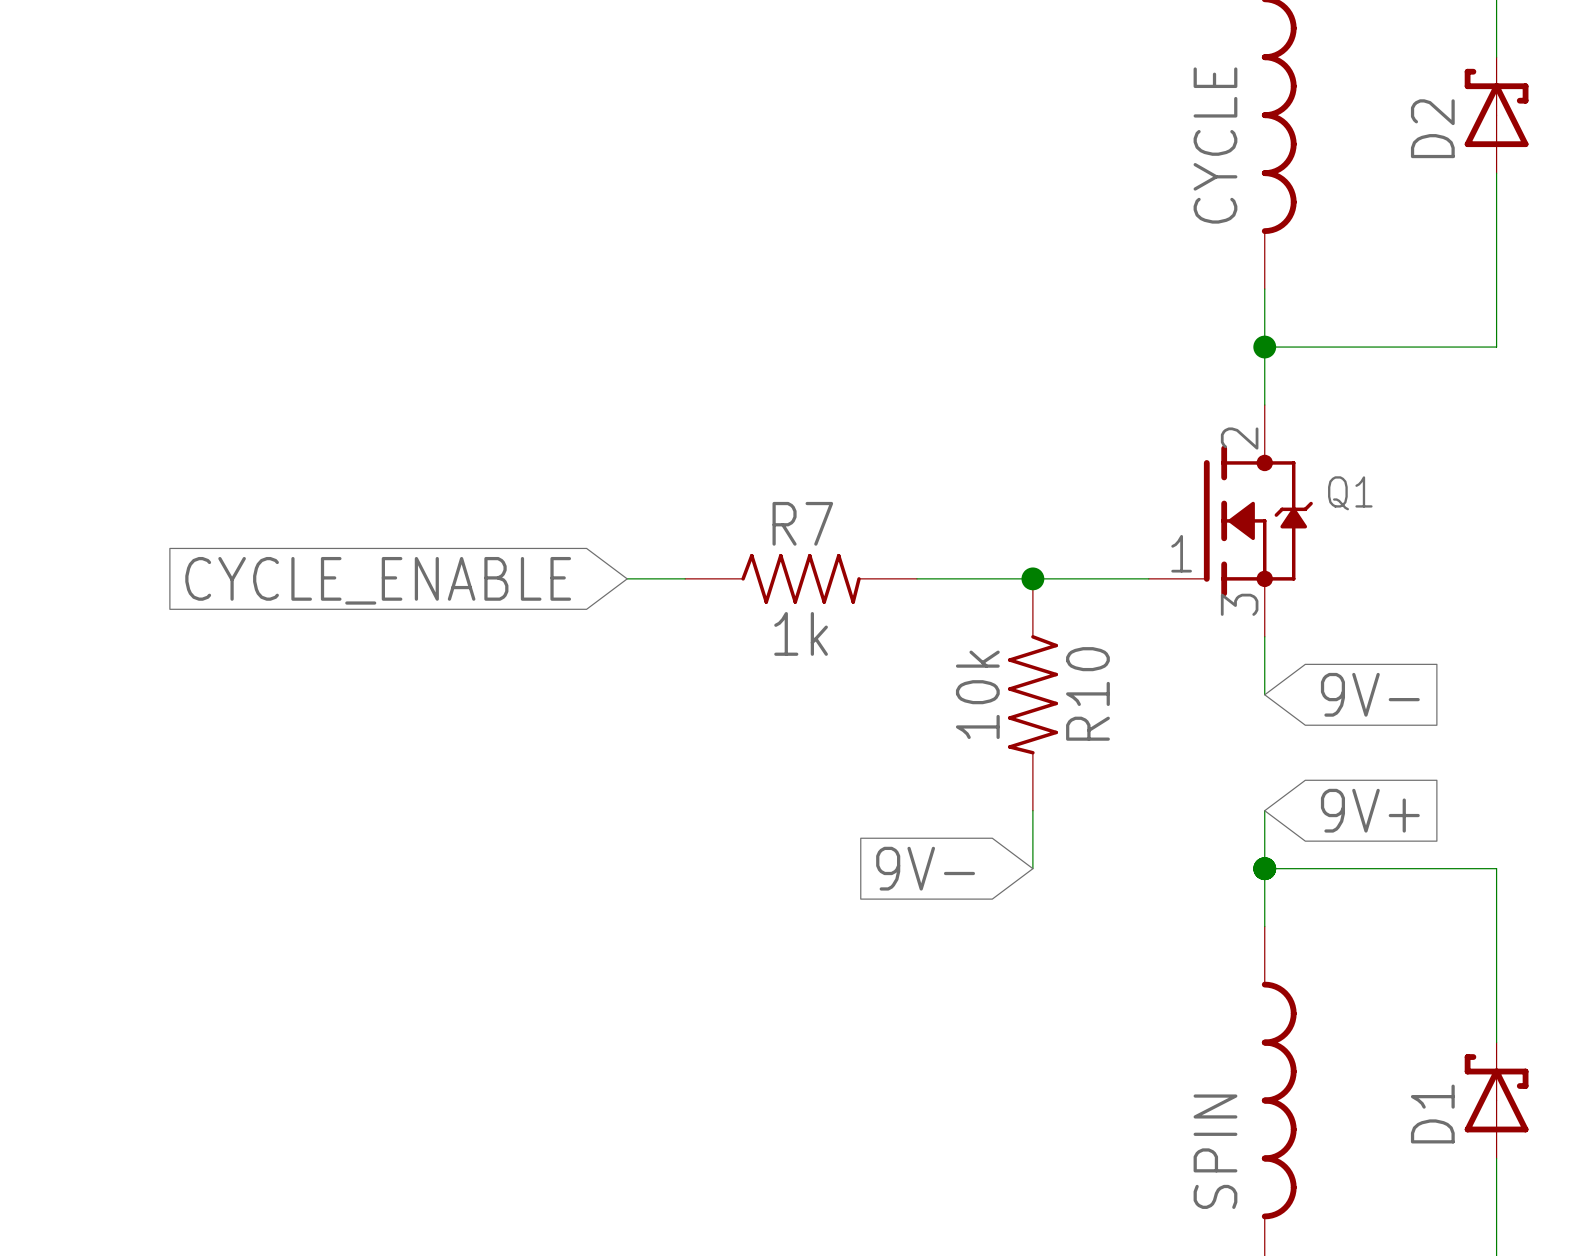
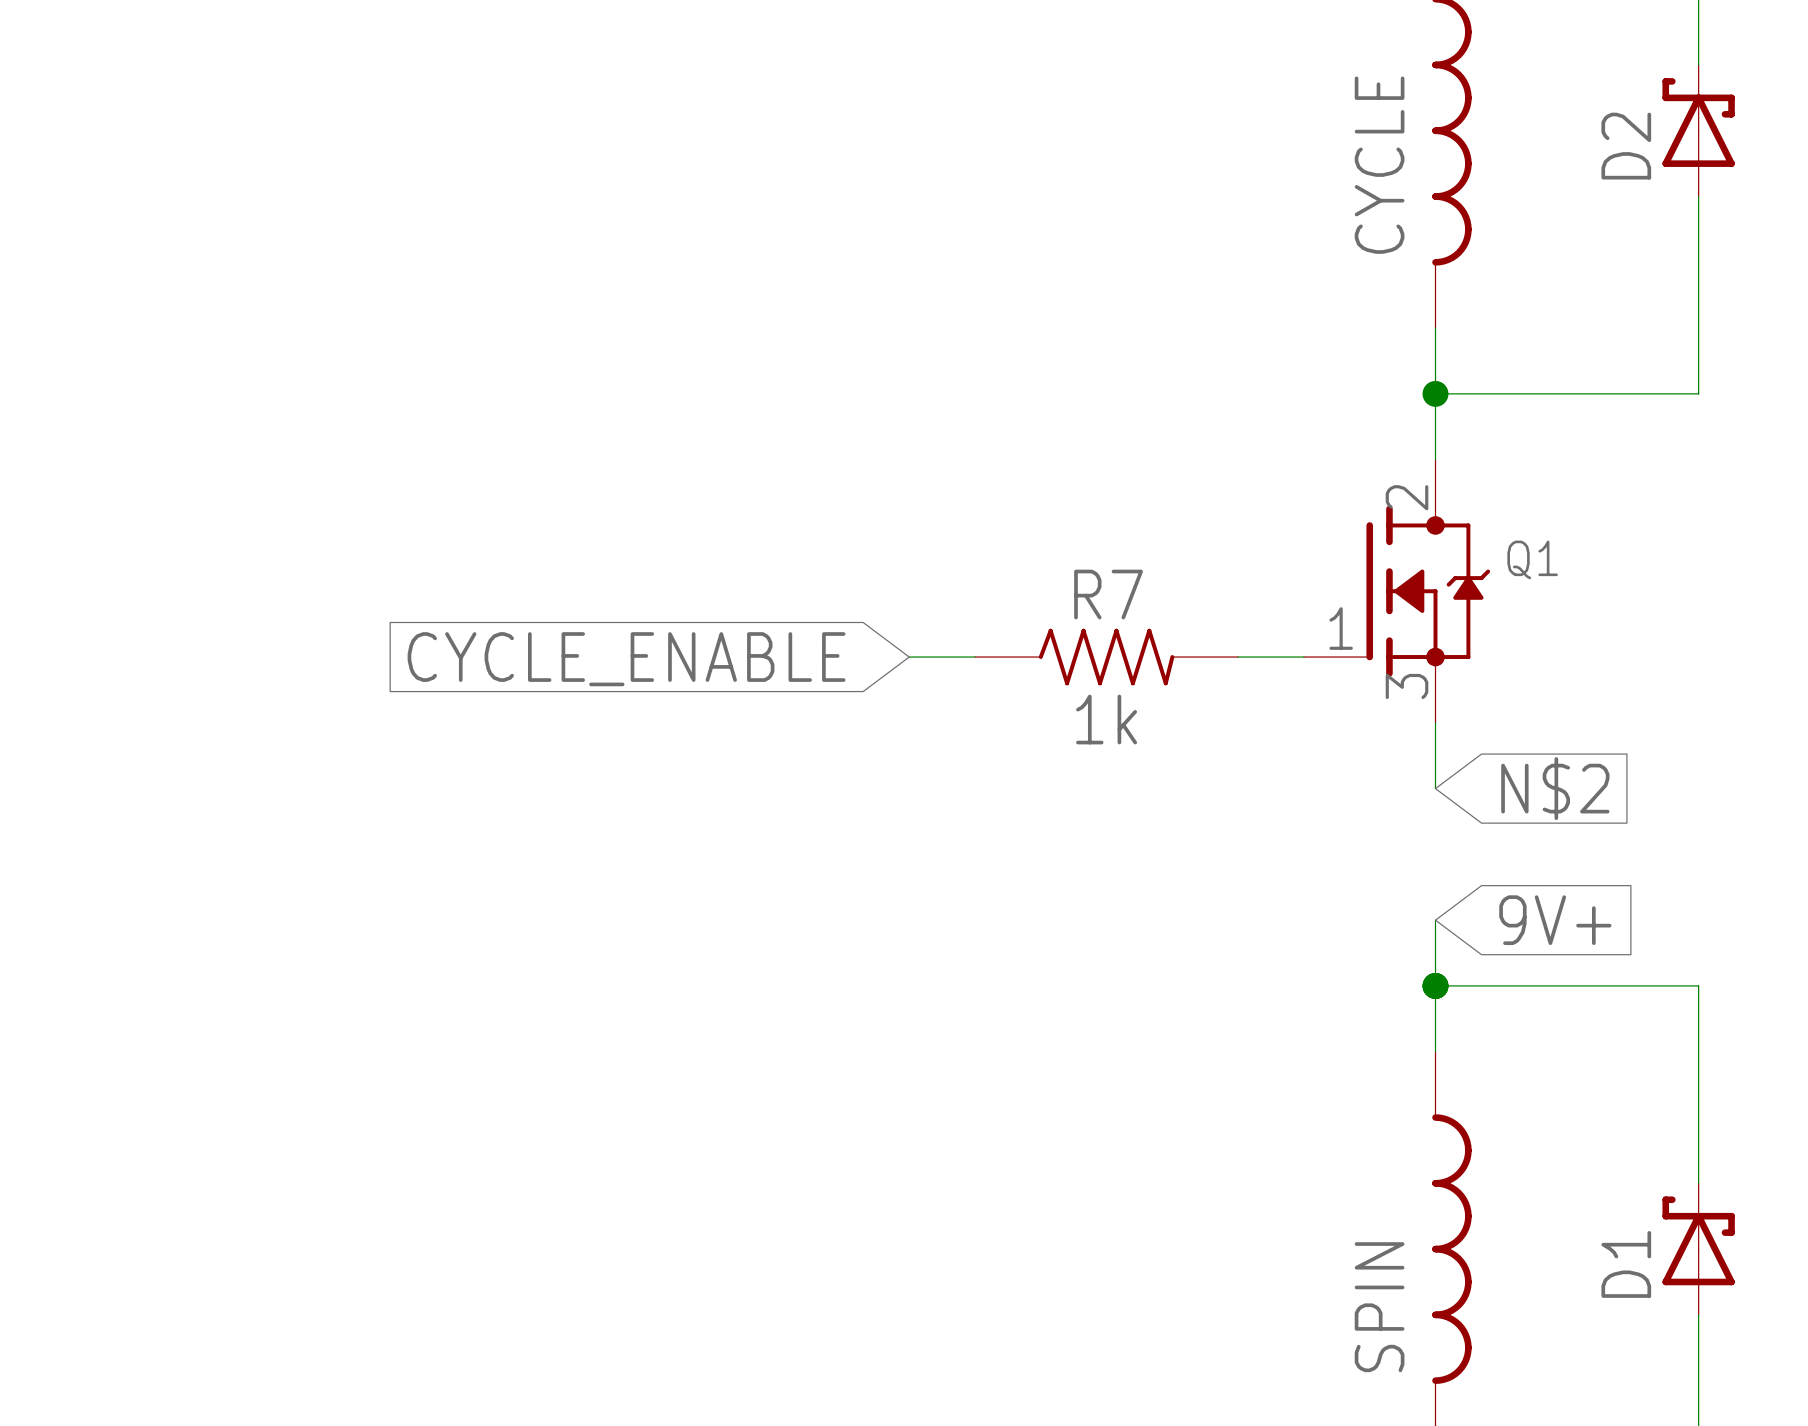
wire: (627, 578) (685, 578) -> (909, 657) (975, 657)
R7 position: (801, 578) -> (1106, 657)
wire: (916, 578) (1090, 578) -> none
junction: (1032, 578) -> none
global label position: CYCLE_ENABLE (378, 580) -> CYCLE_ENABLE (626, 659)
R10: 10k (1032, 694) -> none
global label: 9V- (1370, 694) -> N$2 (1555, 788)
wire: (1032, 810) (1032, 868) -> none
global label: 9V- (925, 868) -> none

